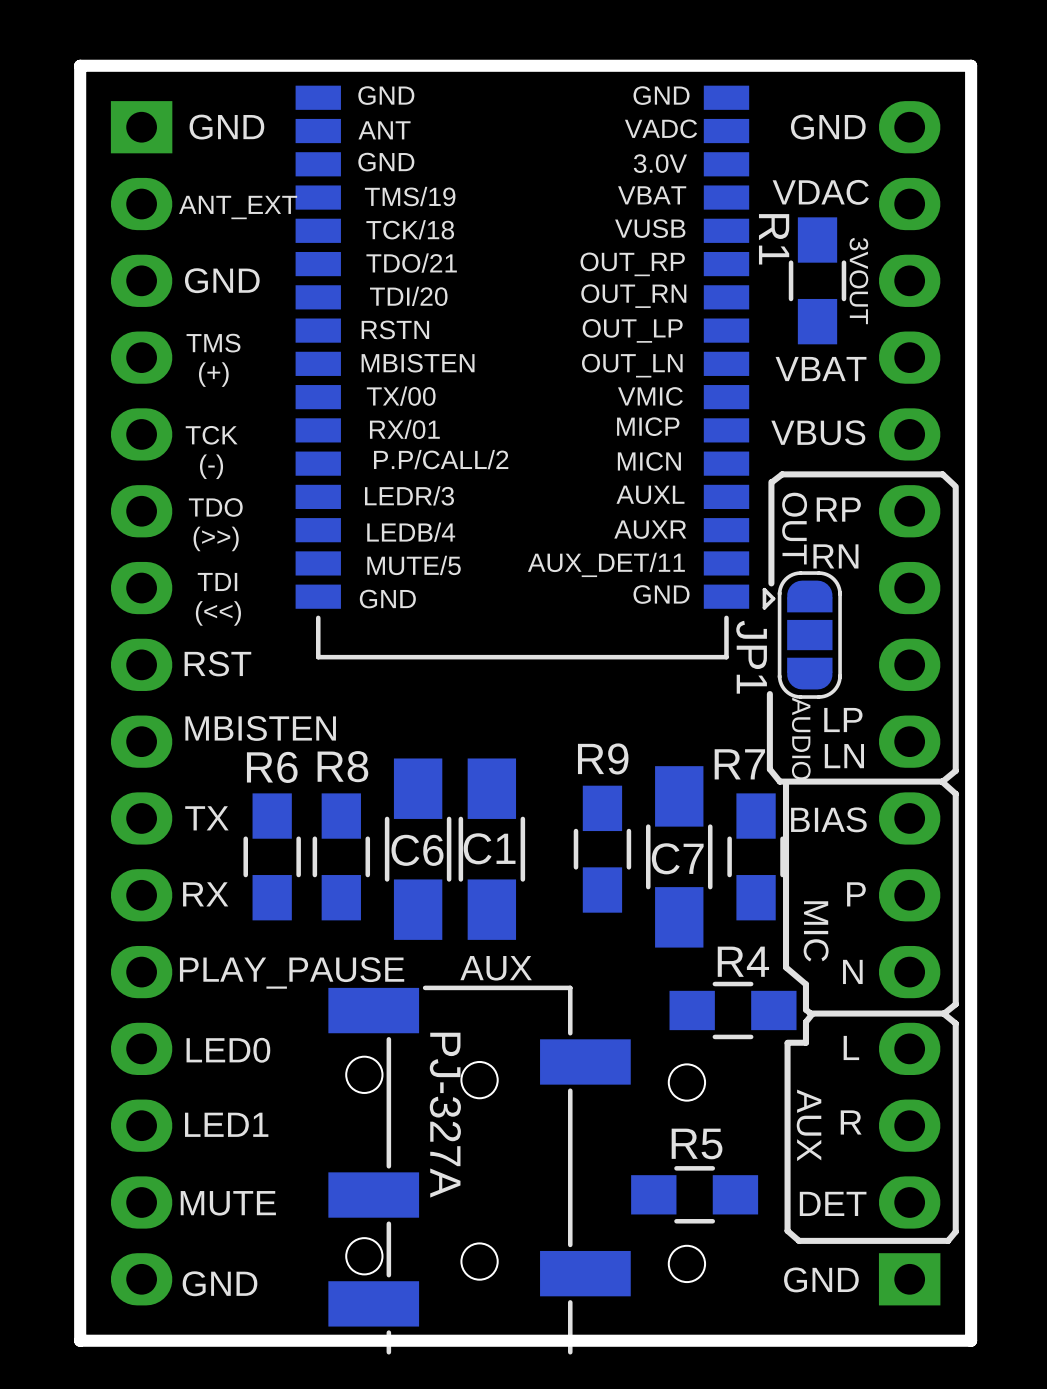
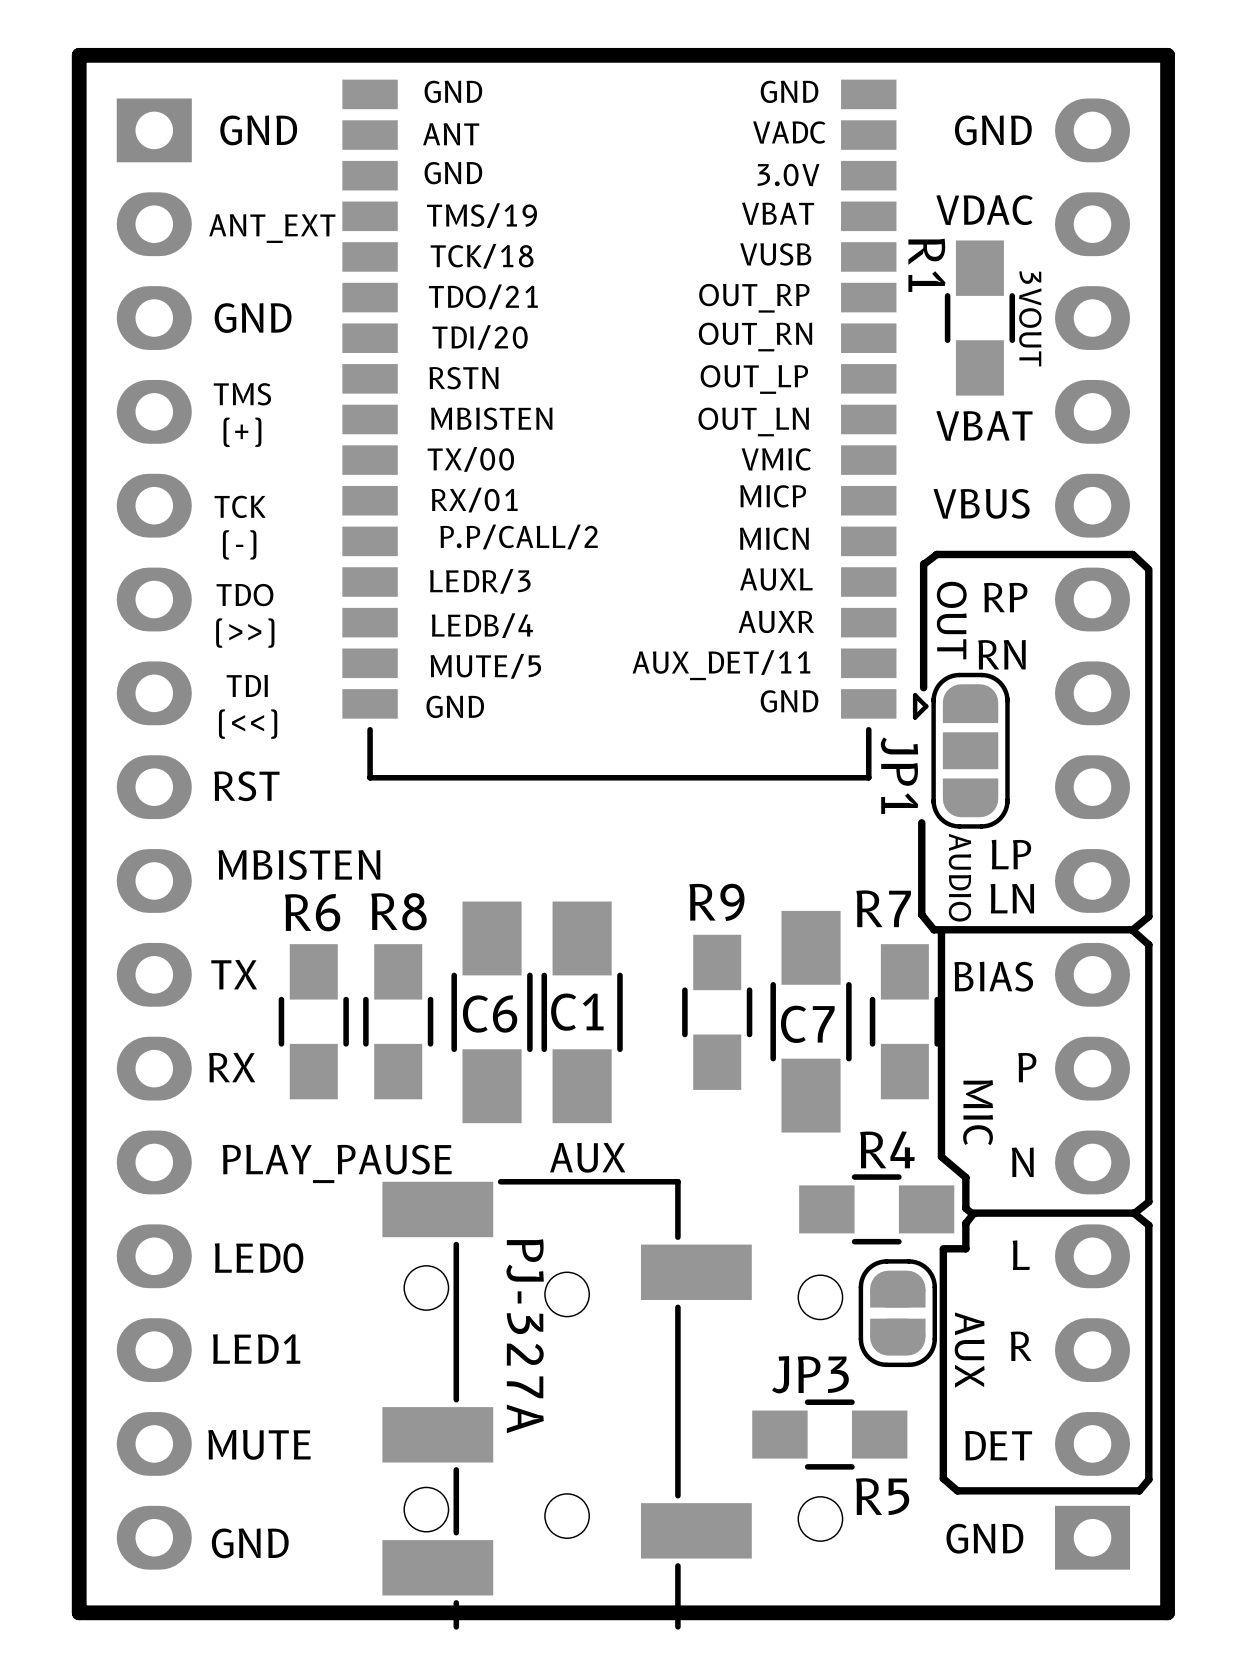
JP3: none -> (897, 1313)
R5 name position: R5 (697, 1143) -> R5 (882, 1496)

